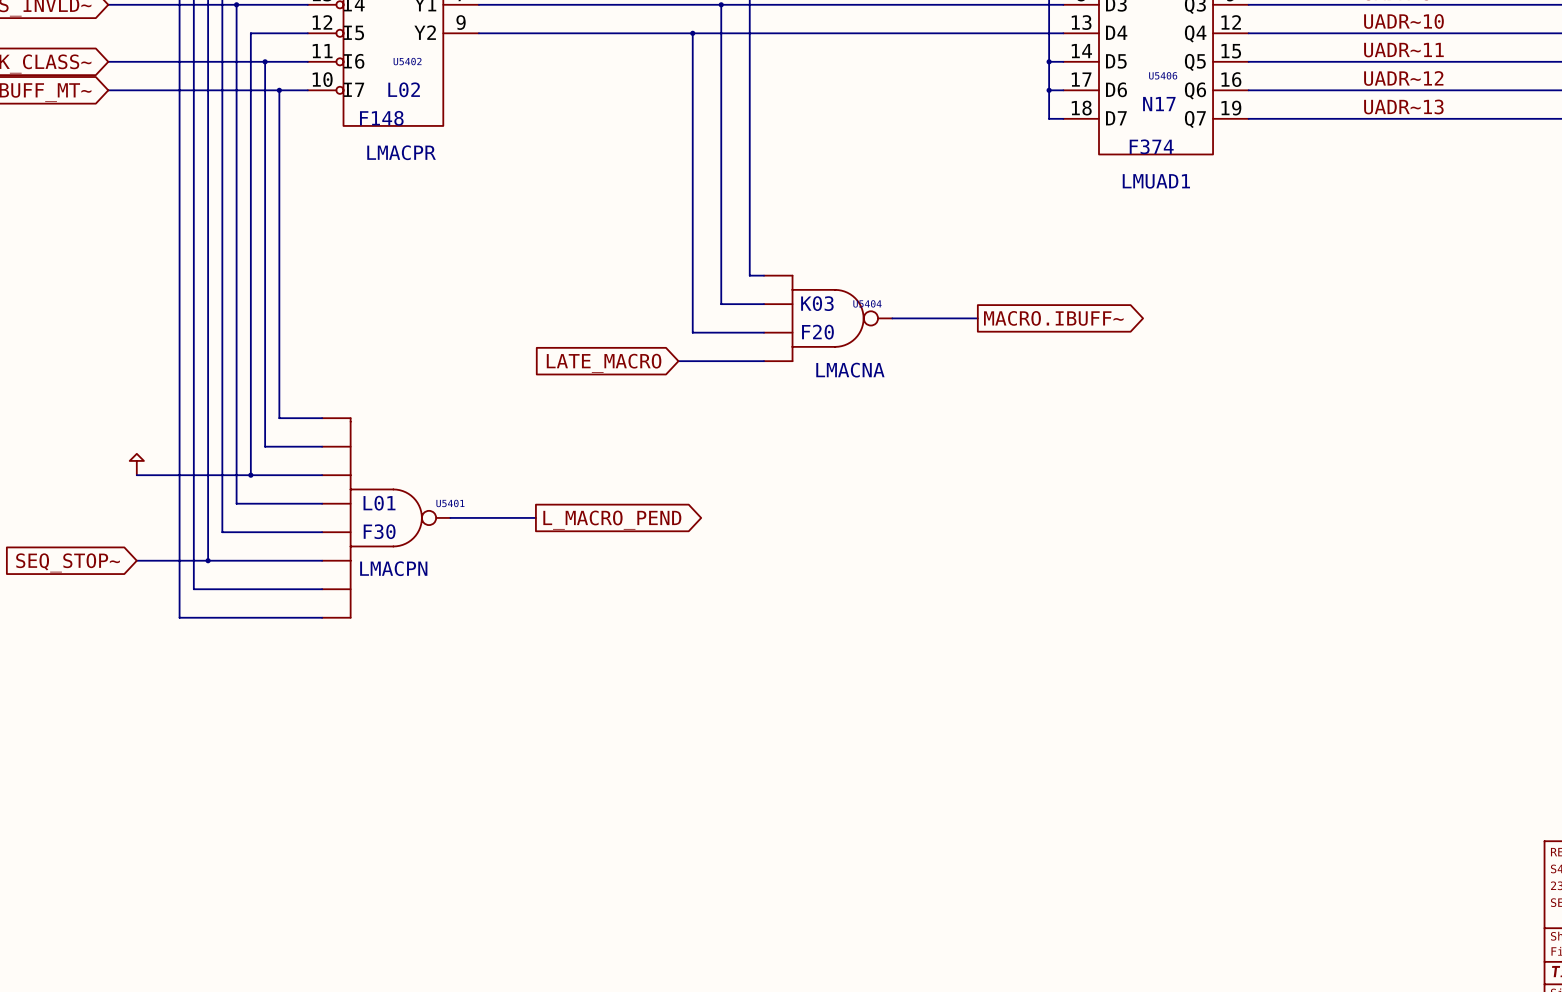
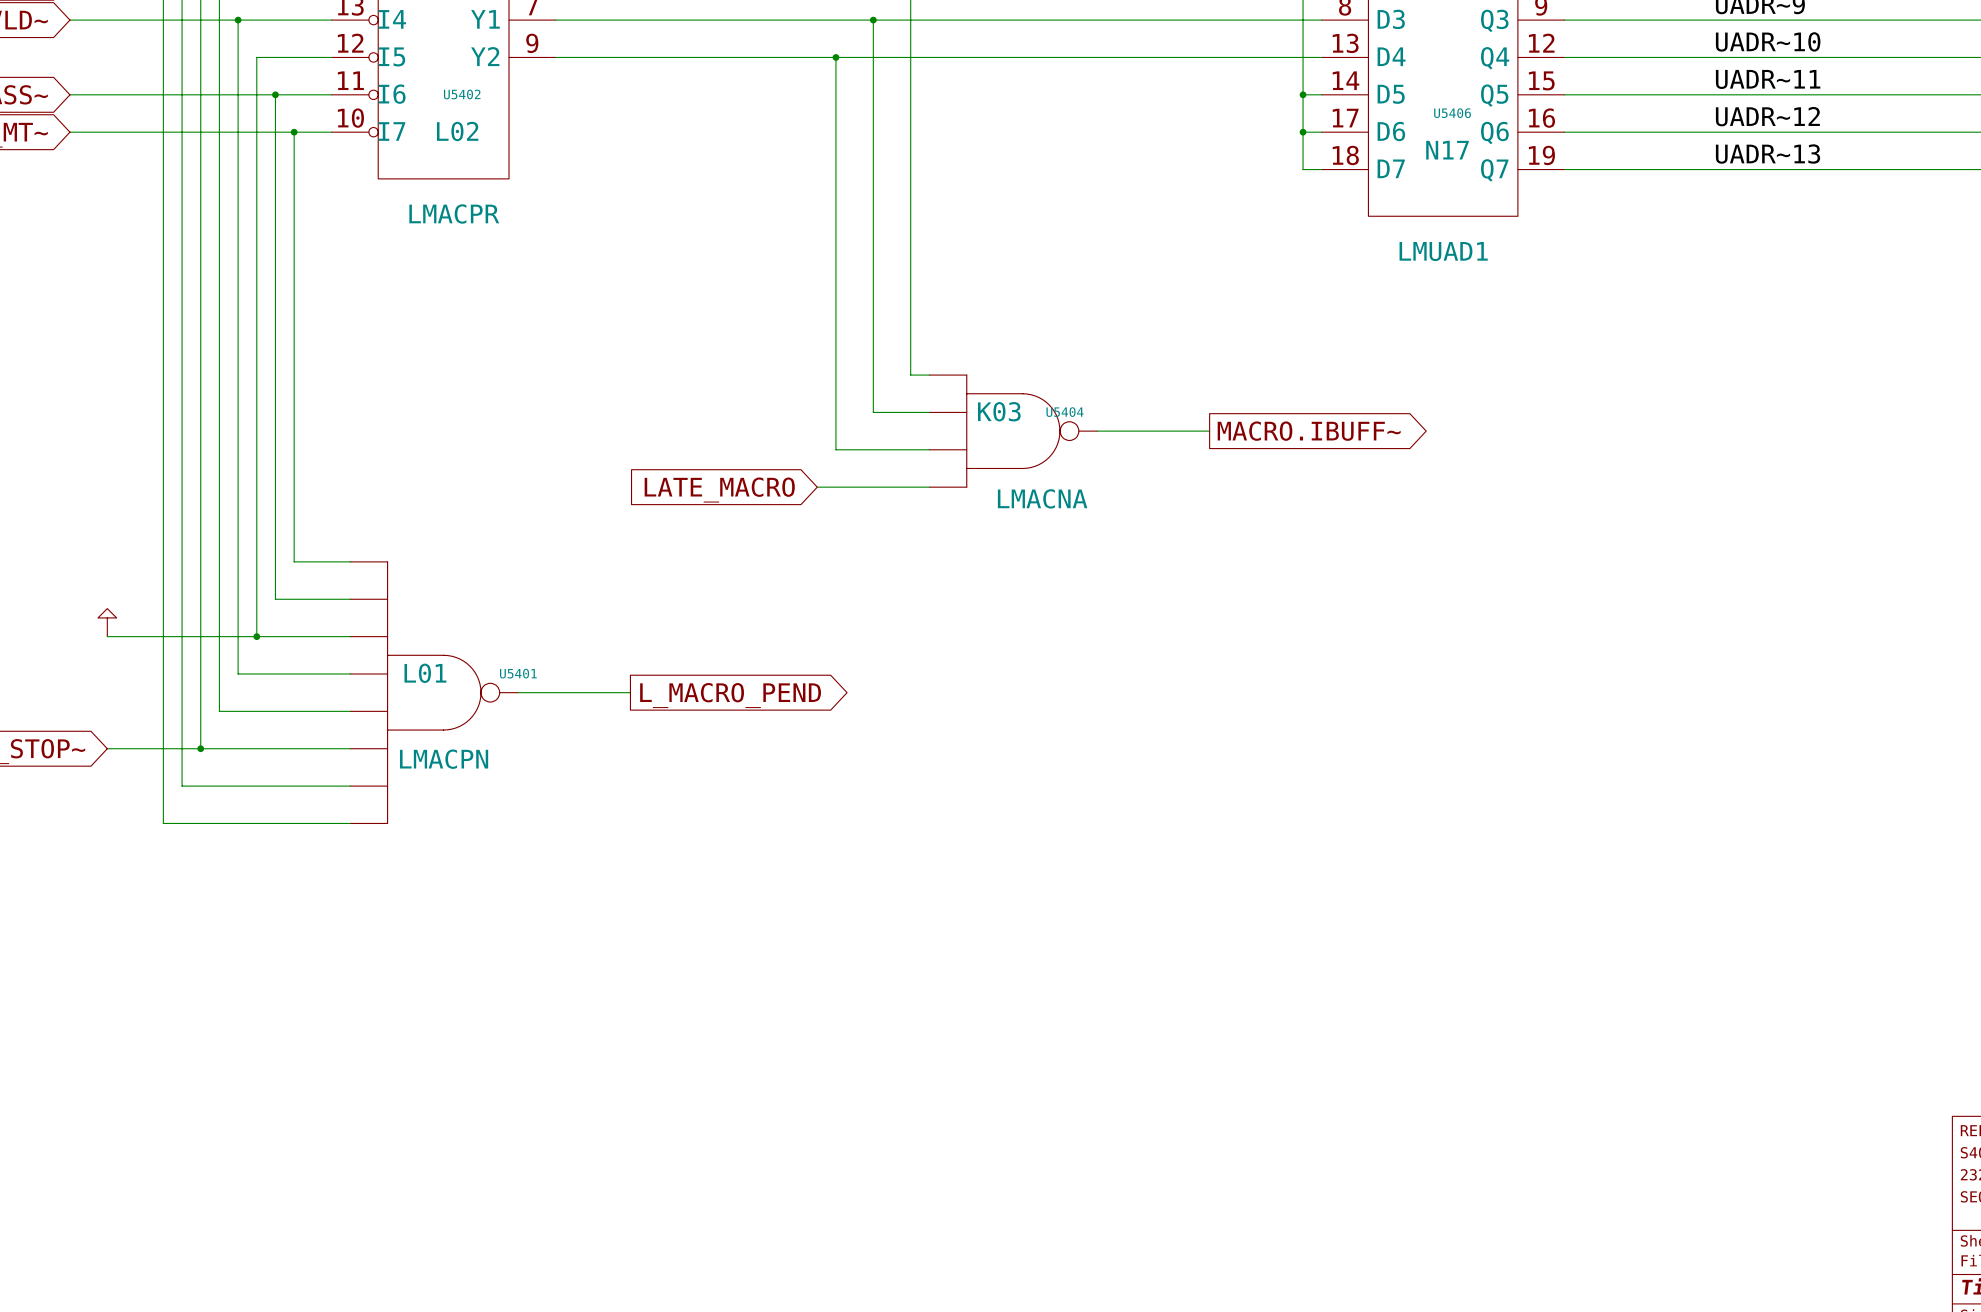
U5402 value: F148 (381, 118) -> none
U5406 value: F374 (1151, 146) -> none
U5404 value: F20 (817, 332) -> none
U5401 value: F30 (379, 531) -> none

